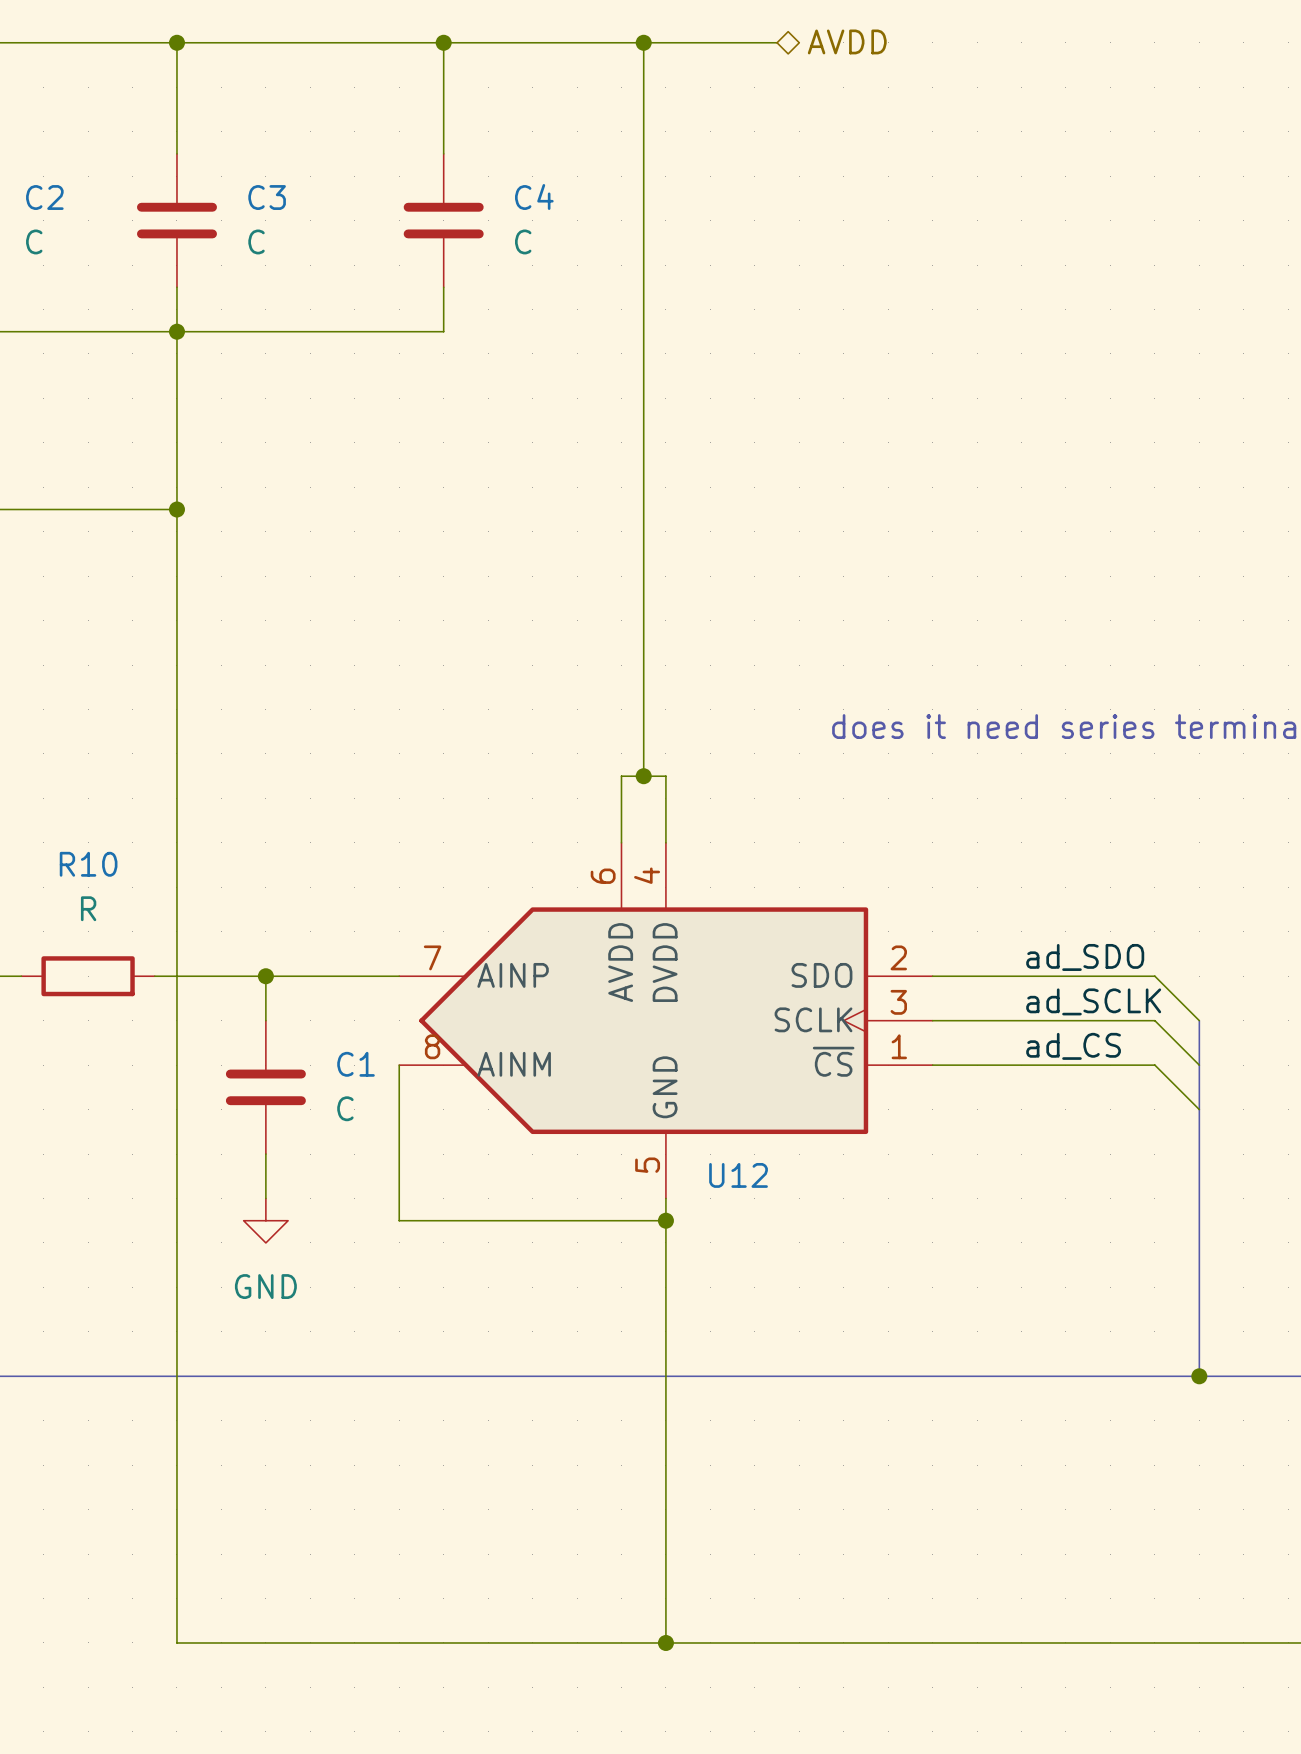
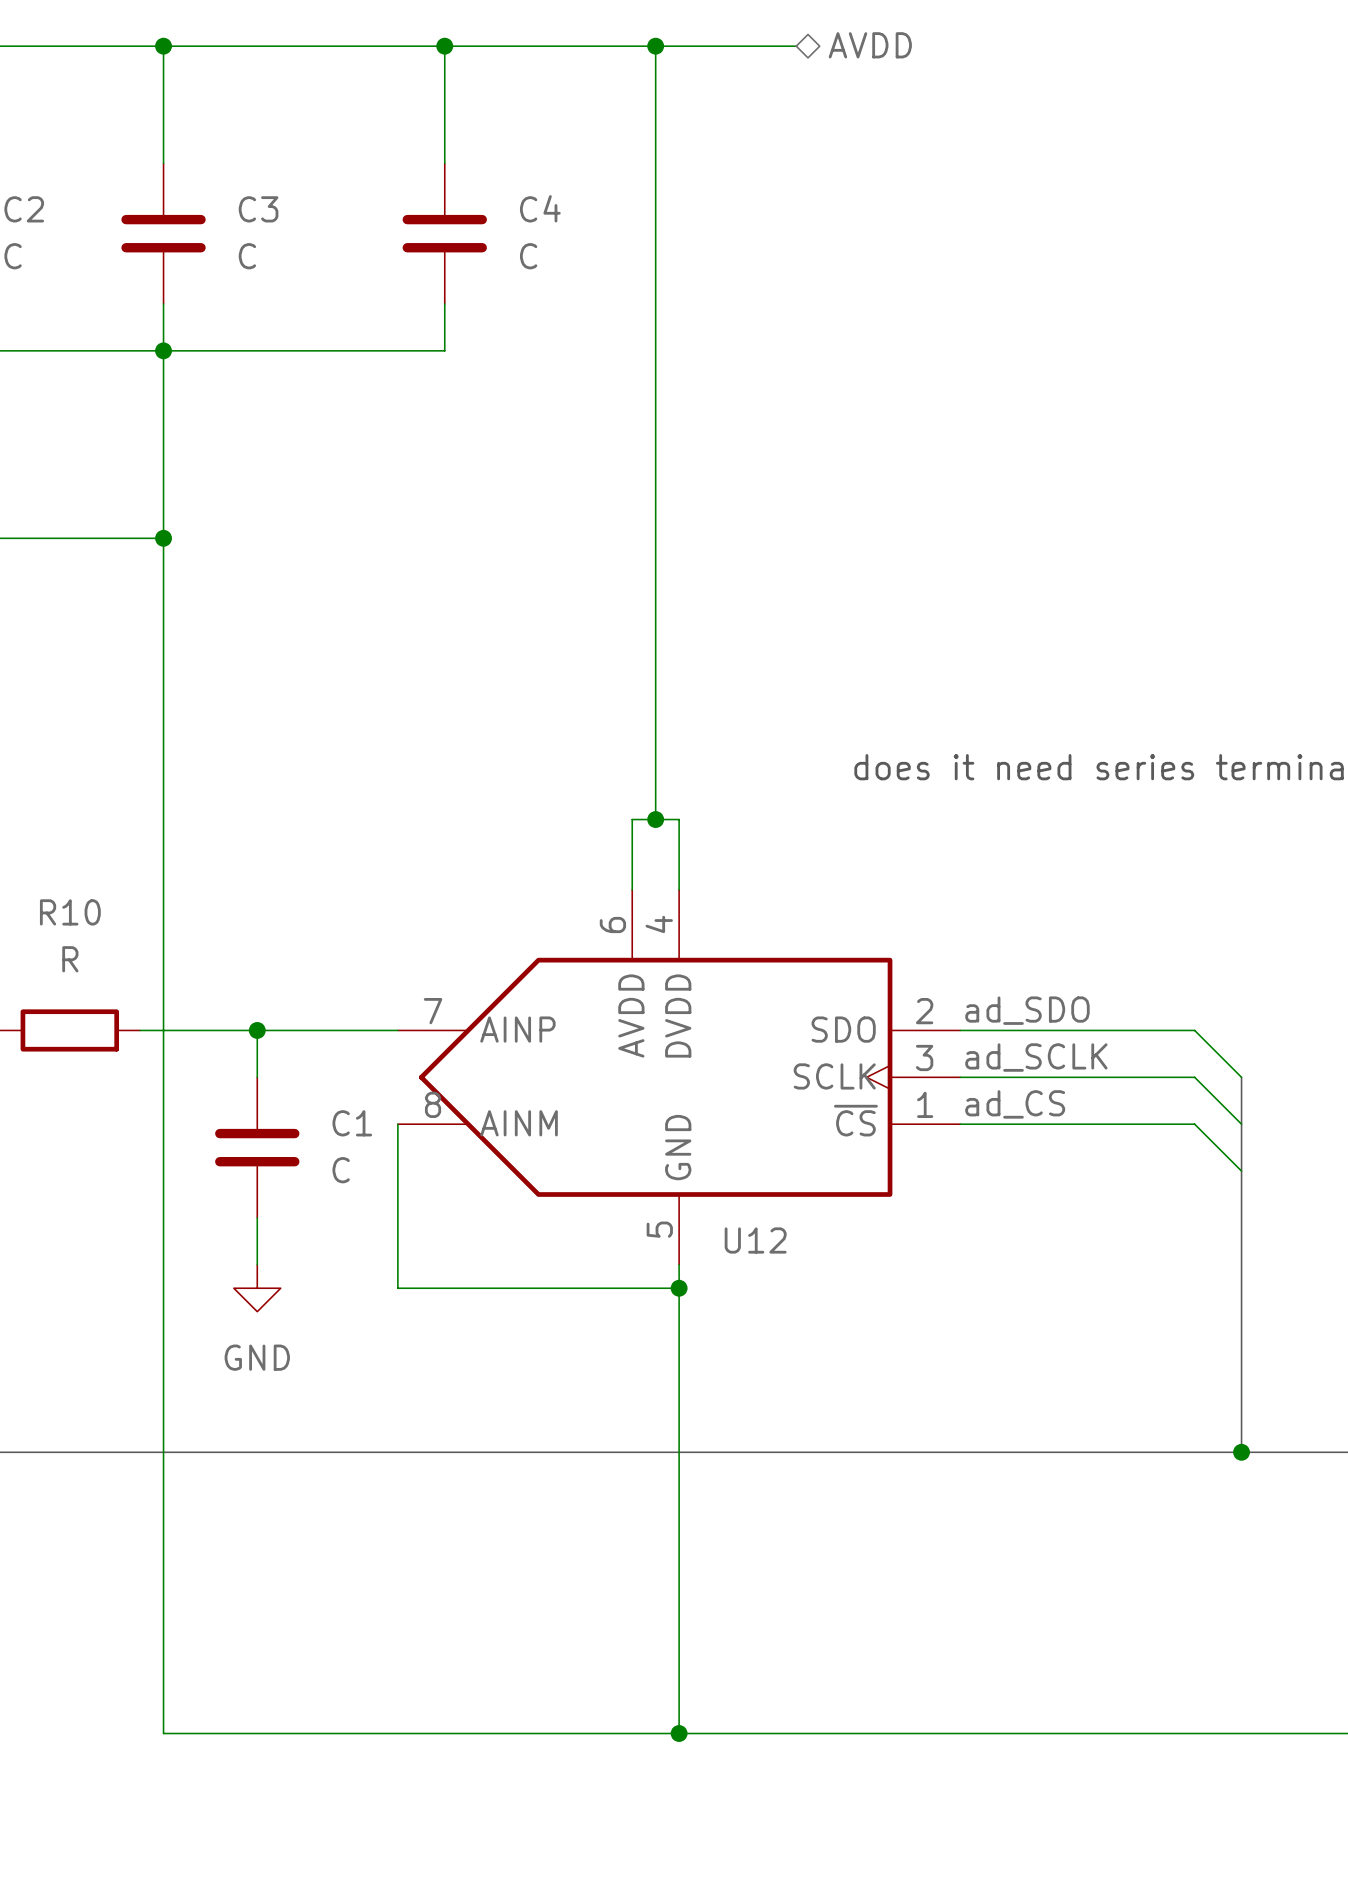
label position: ad_SDO (1085, 957) -> ad_SDO (1027, 1010)
label position: ad_SCLK (1093, 1001) -> ad_SCLK (1036, 1057)
label position: ad_CS (1073, 1046) -> ad_CS (1015, 1104)

